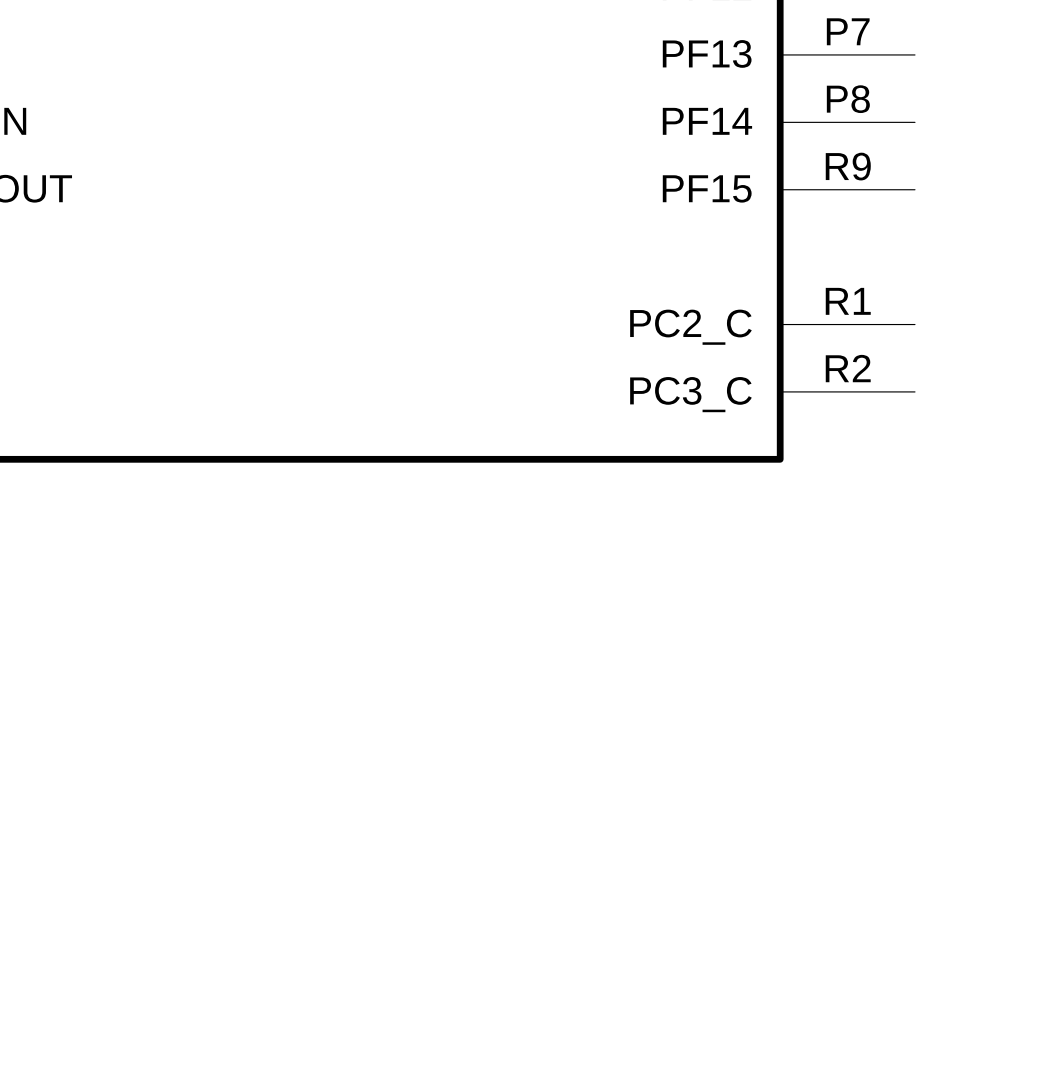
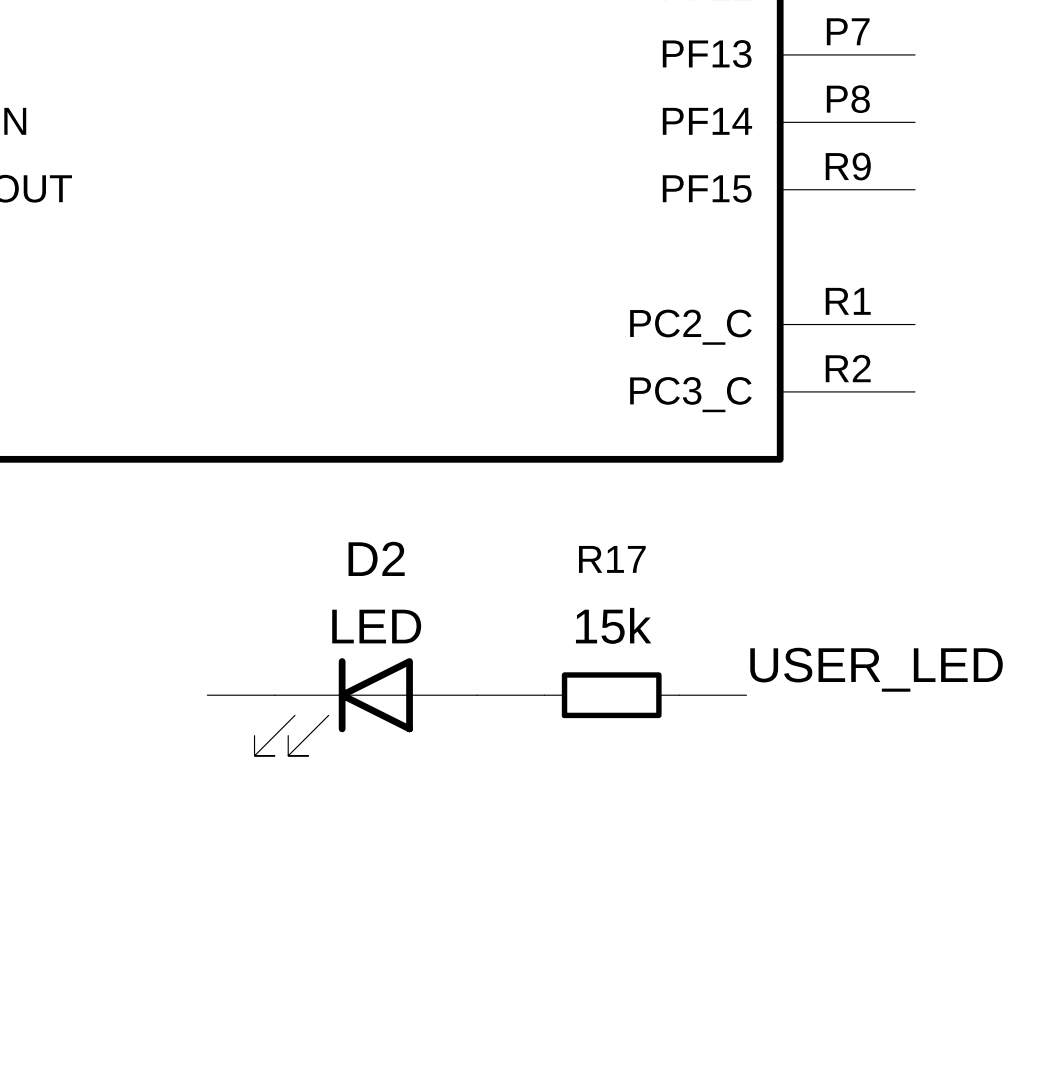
label: none -> USER_LED (876, 669)
wire: none -> (207, 695) (274, 695)
wire: none -> (476, 695) (544, 695)
R17: none -> 15k (611, 695)
wire: none -> (679, 695) (746, 695)
D2: none -> LED (365, 707)

